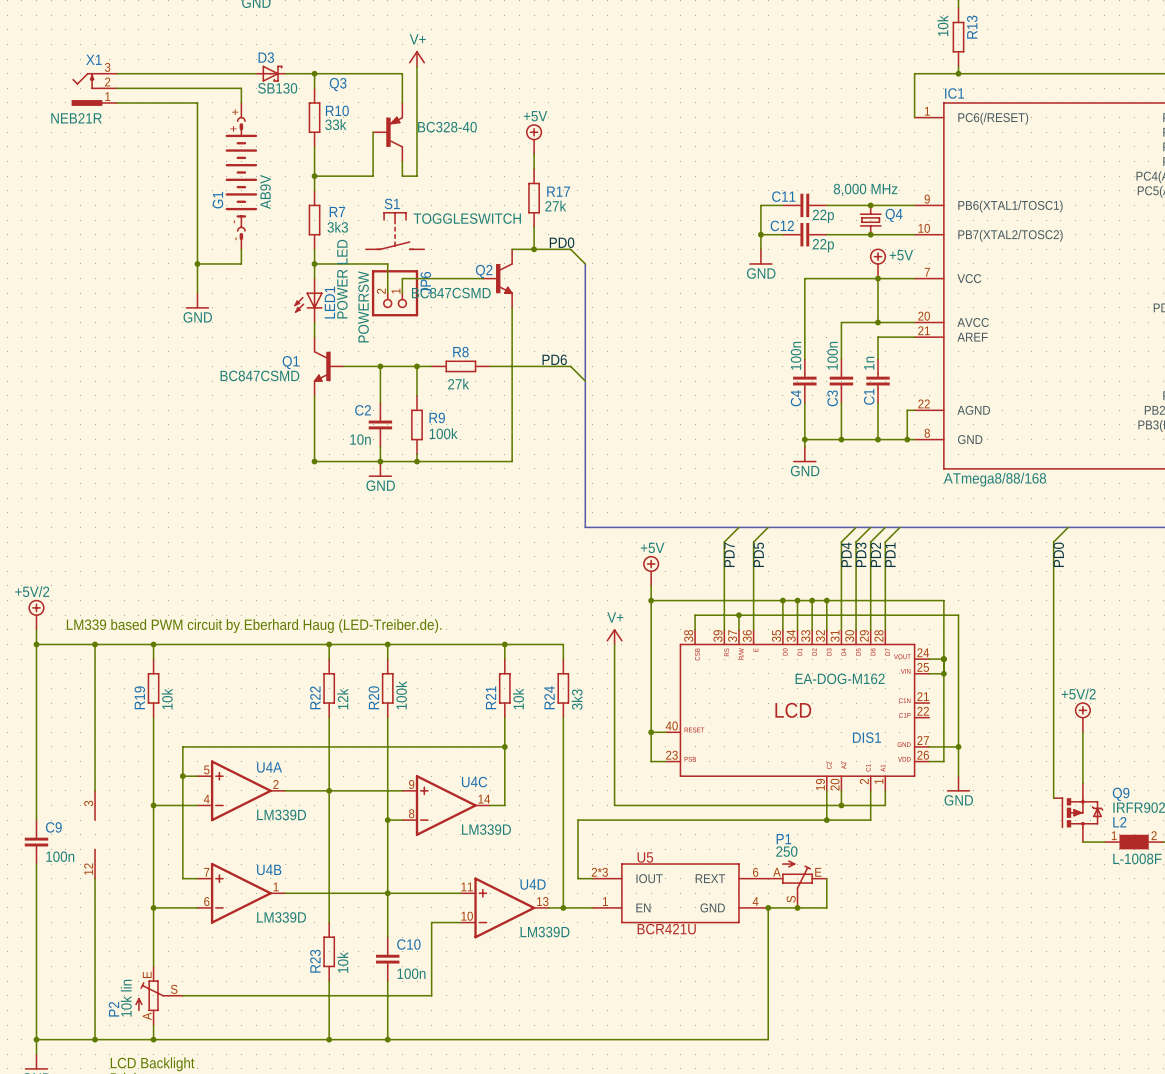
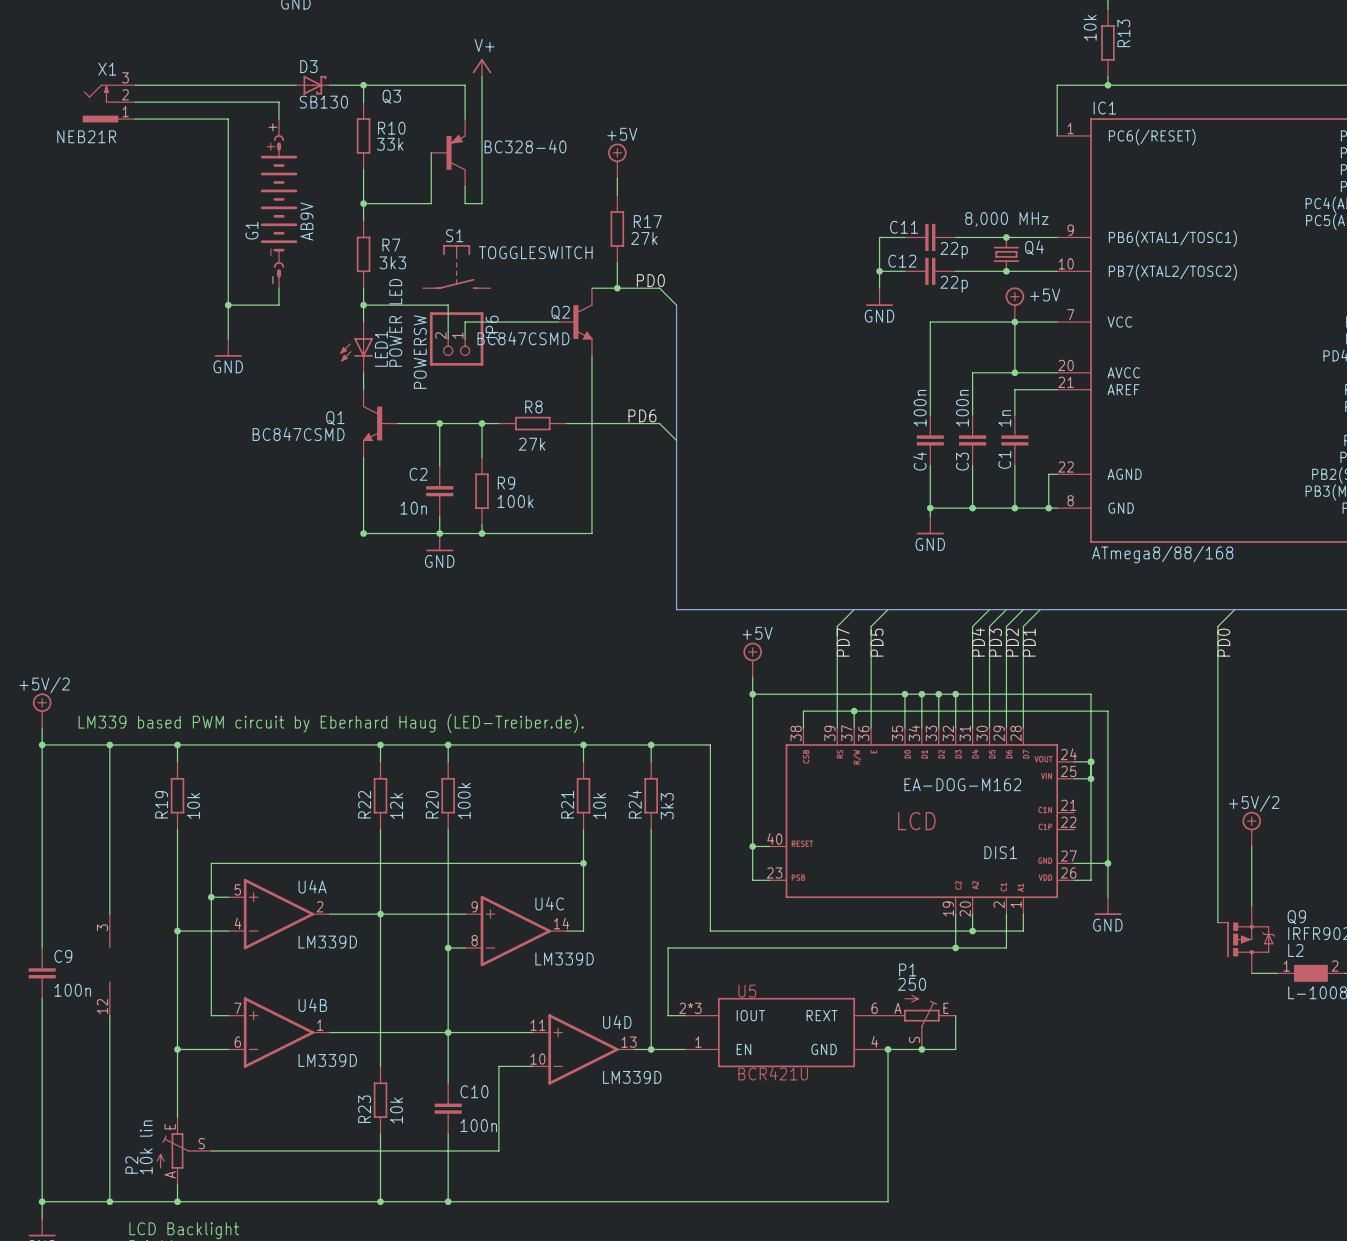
power symbol: V+ (614, 636) -> none
wire: none -> (651, 744) (710, 744)
junction: none -> (651, 744)

